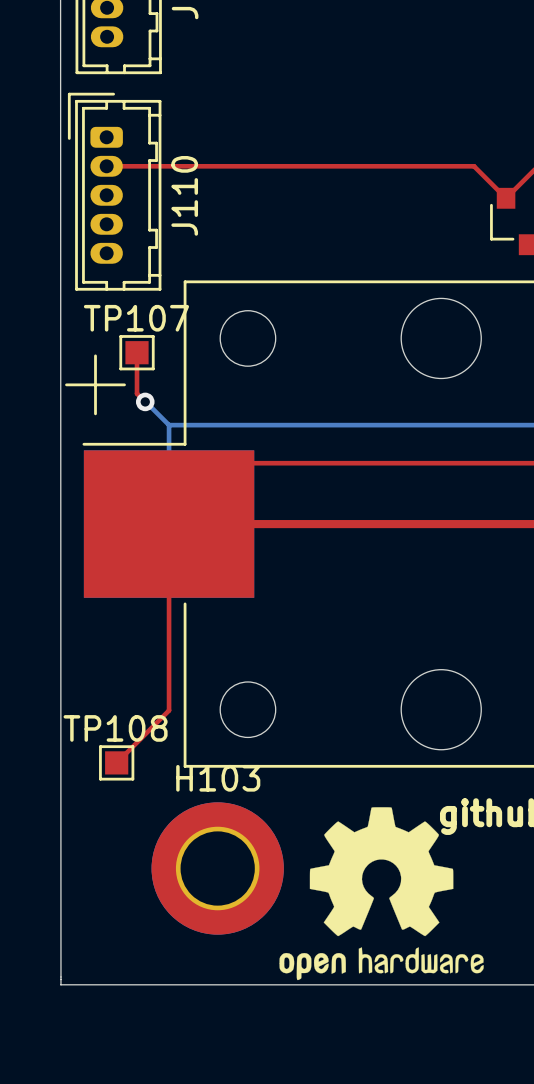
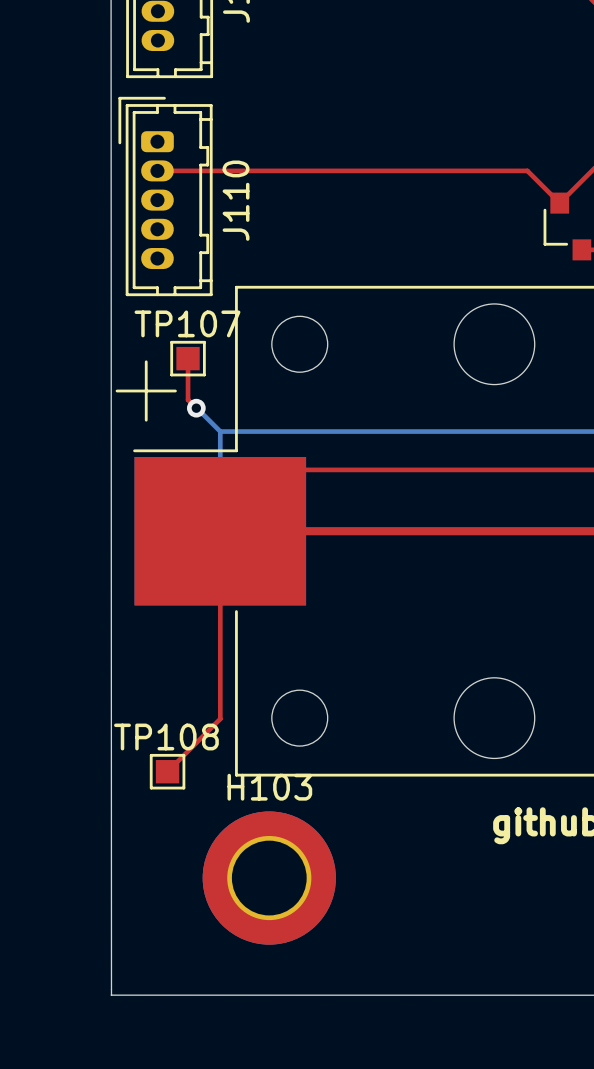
drawing: [279, 807, 484, 981] -> none

